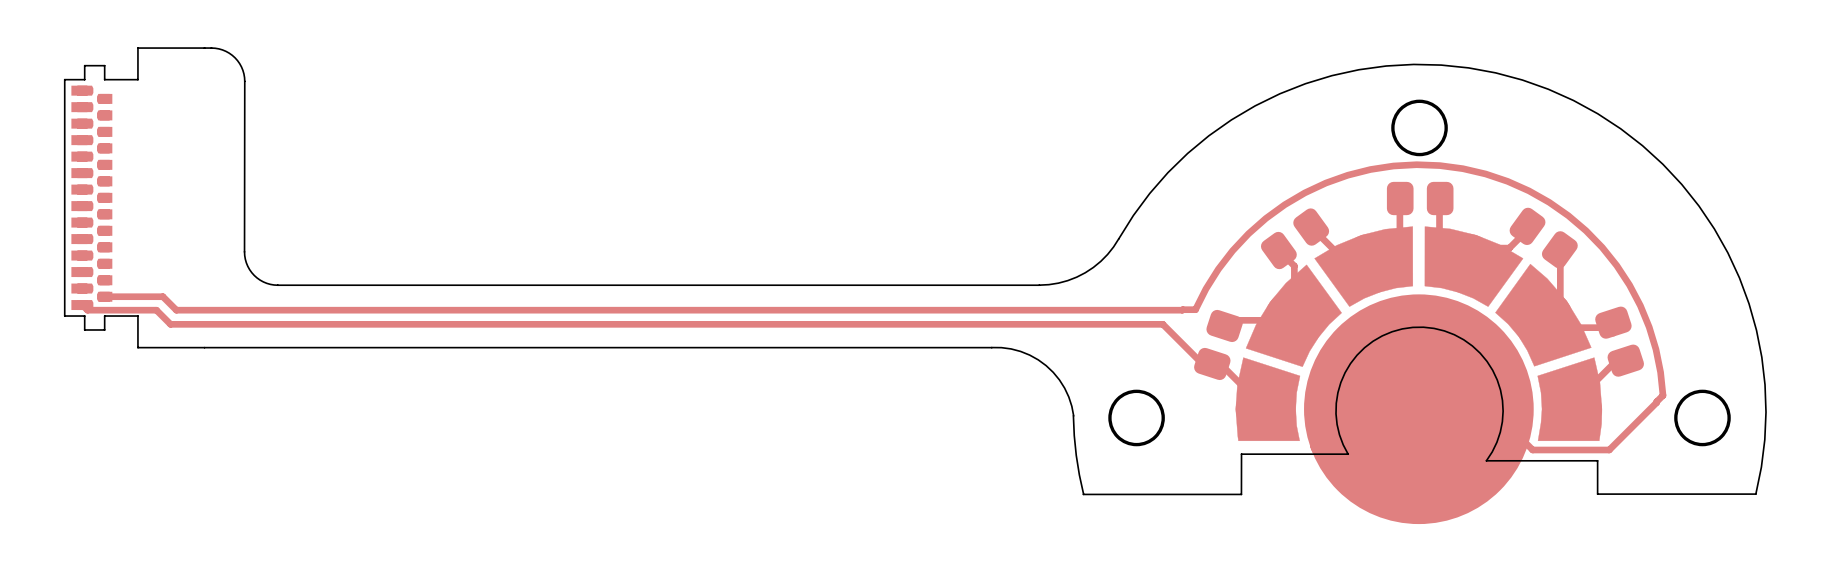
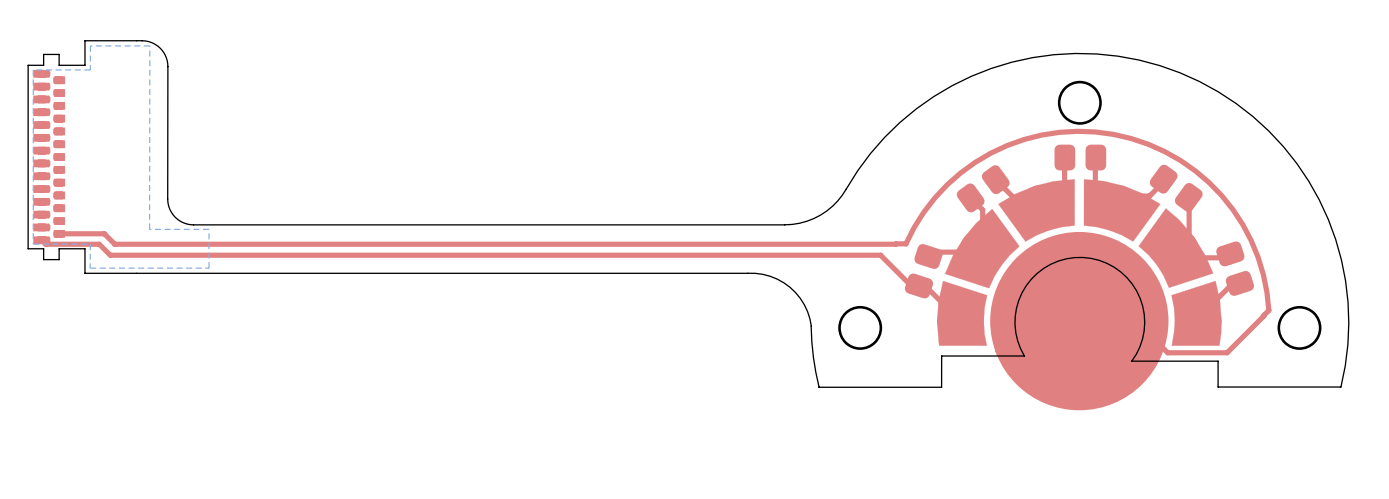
bottom zone outline: none -> (149, 45) (149, 229) (209, 229) (209, 268) (90, 268) (90, 244) (33, 244) (33, 69) (90, 69) (90, 45) (149, 45)

